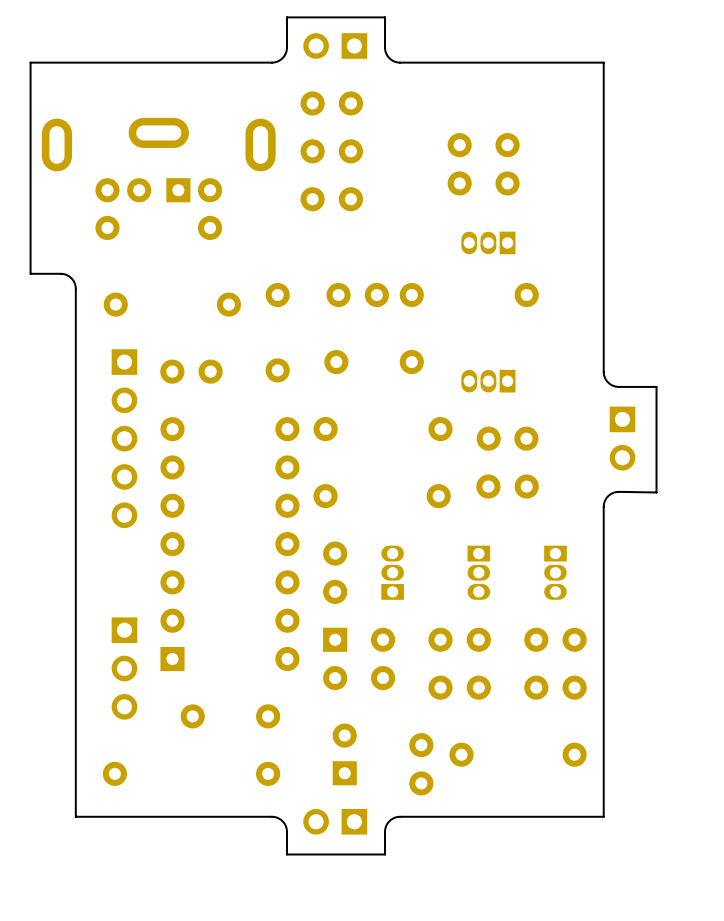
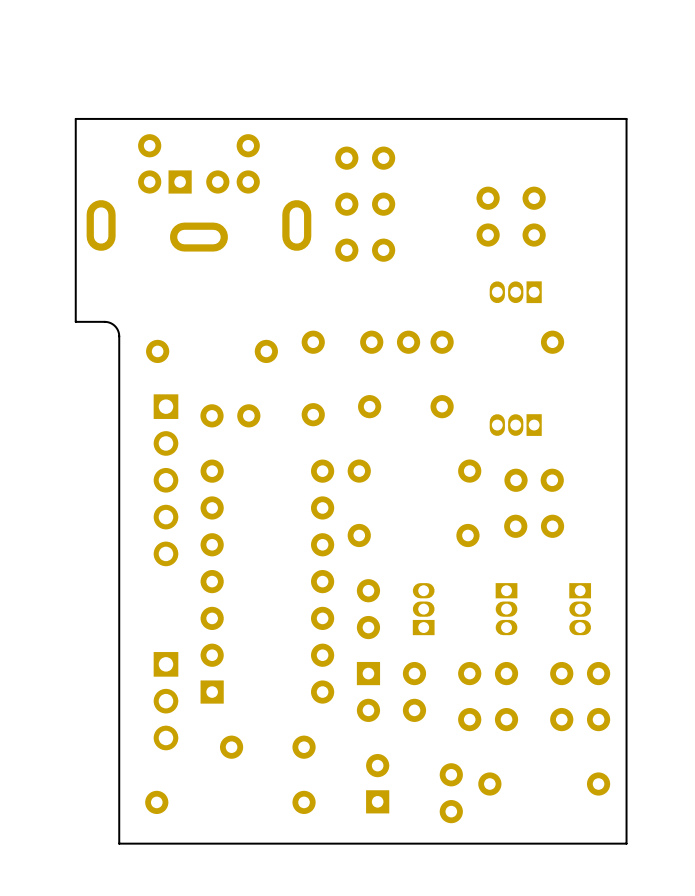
part: (335, 45) -> none
board edge: (400, 62) (392, 60) (385, 52) (385, 17) (286, 17) (286, 52) (281, 59) (271, 62) -> (430, 118) (307, 118)
part rotation: 0° (158, 178) -> 180° (198, 192)
board edge: (603, 371) (607, 381) (615, 386) (656, 386) (656, 492) (615, 492) (607, 497) (603, 506) -> (626, 416) (626, 545)
part: (622, 438) -> none
board edge: (400, 816) (392, 819) (385, 826) (385, 854) (286, 854) (286, 826) (279, 819) (271, 816) -> (430, 843) (307, 843)
part: (335, 821) -> none

